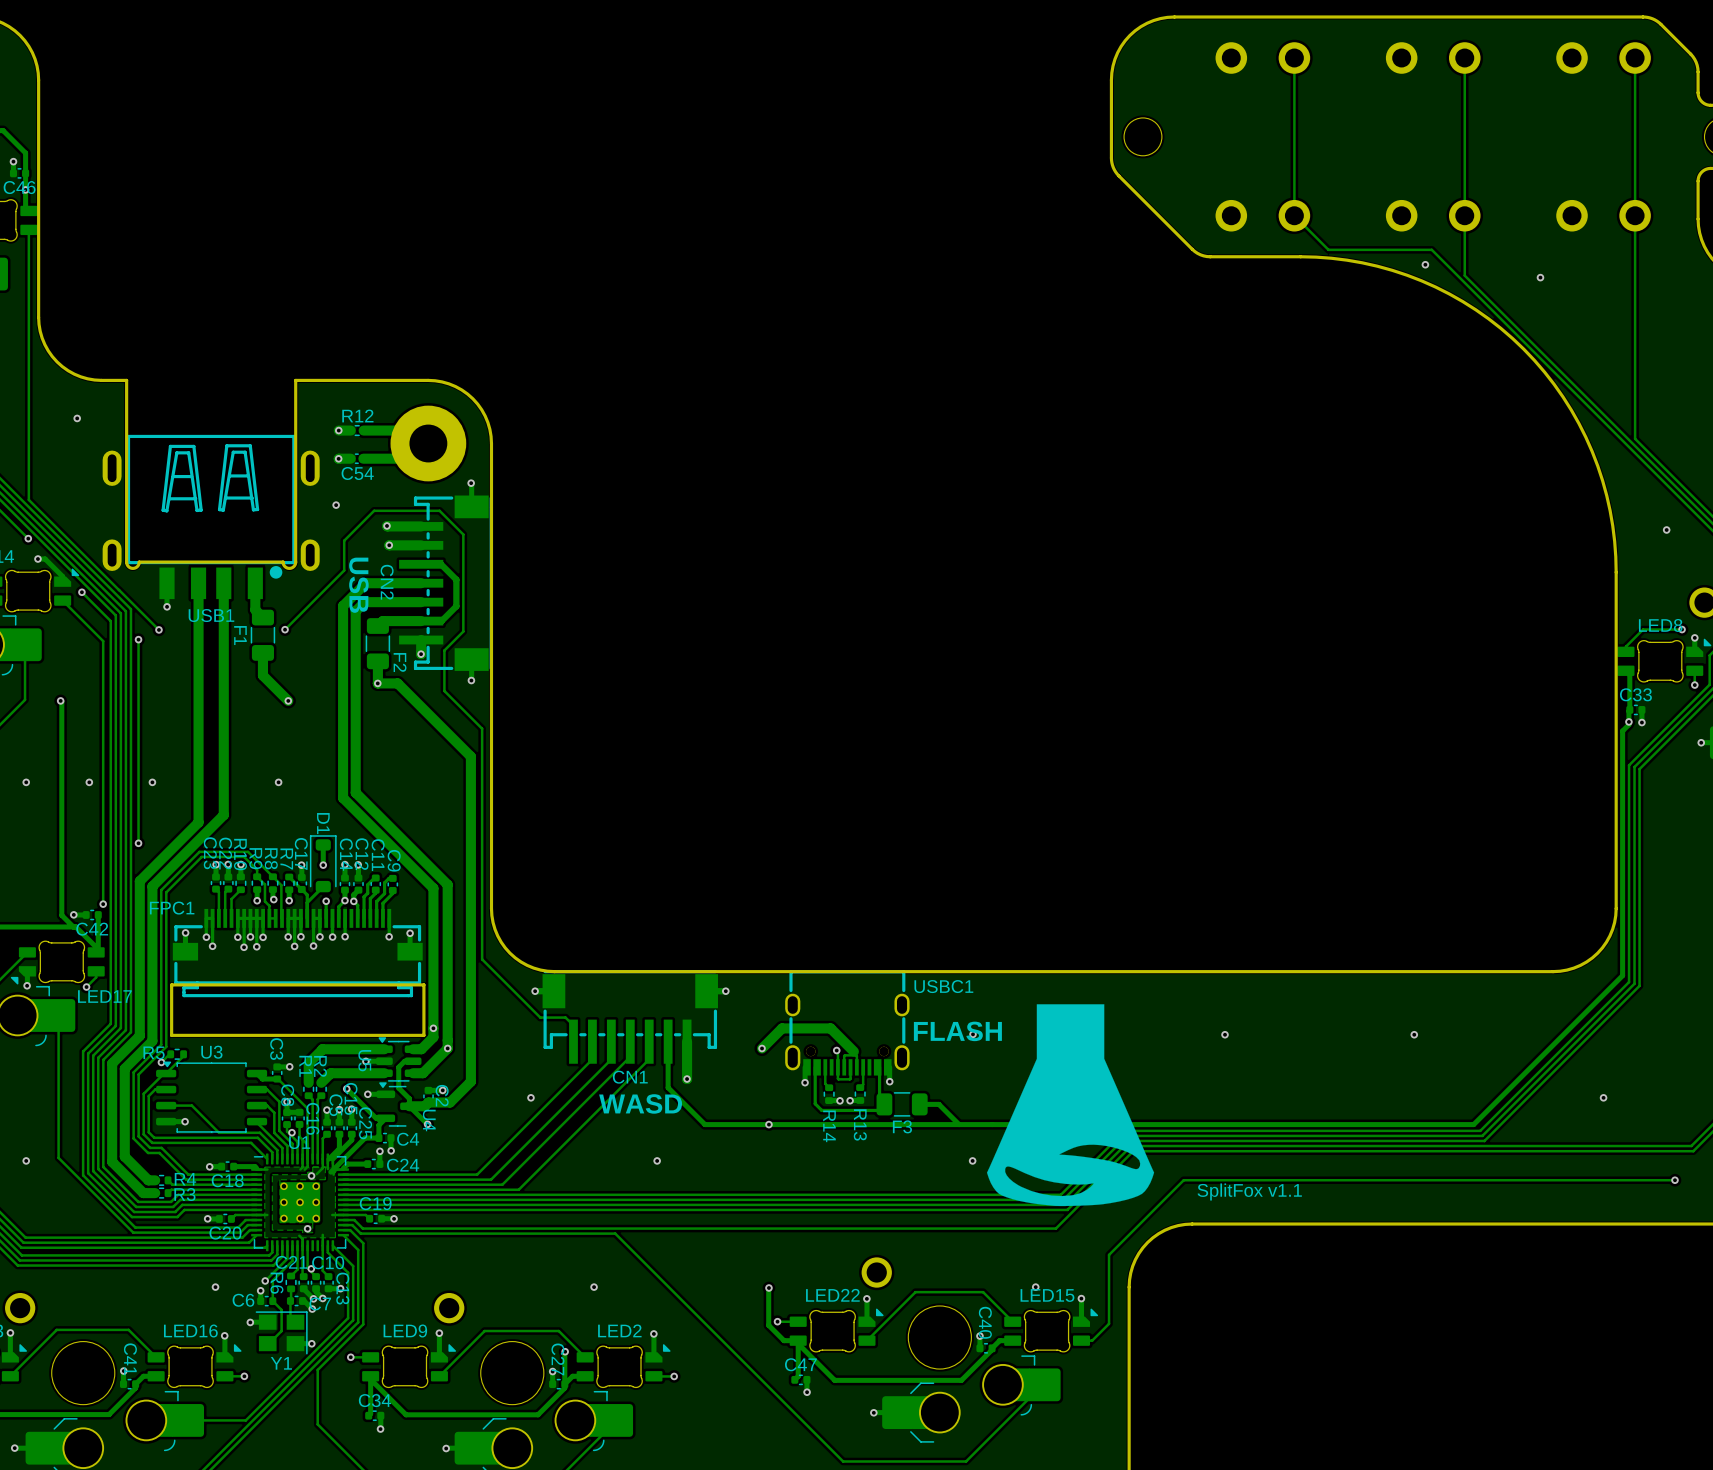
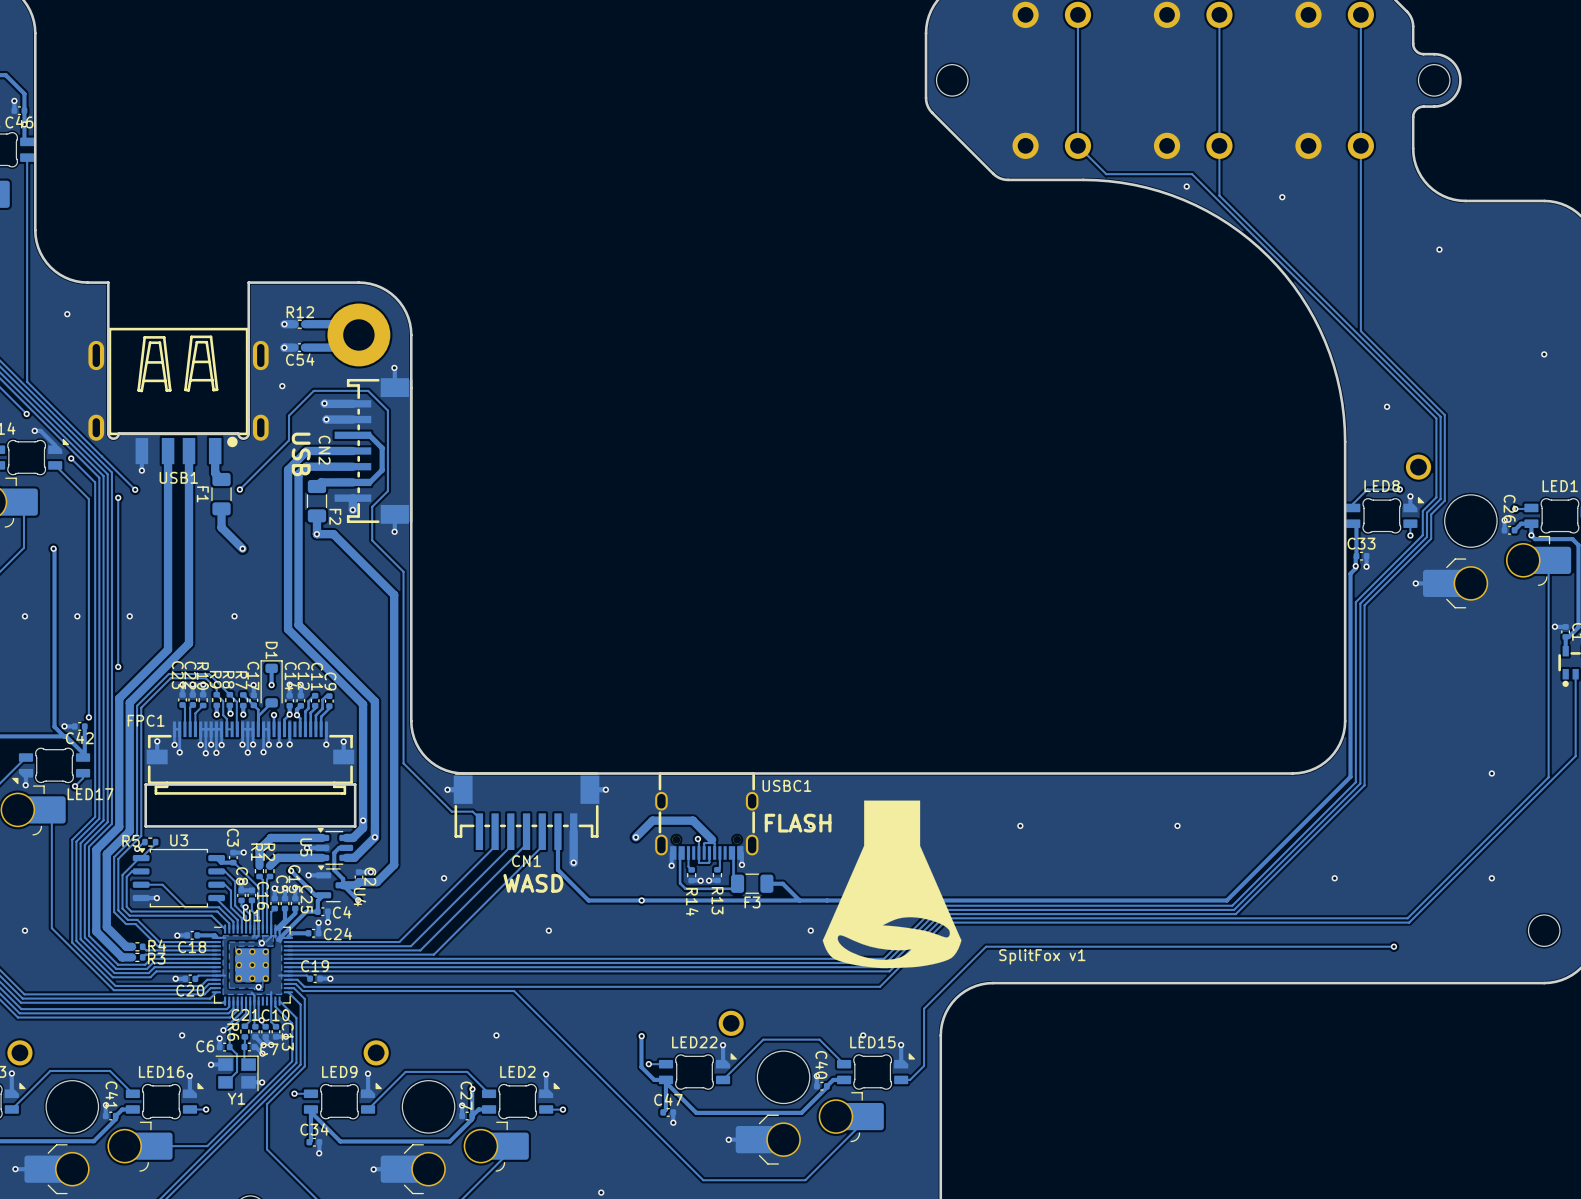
text: SplitFox v1.1 (1249, 1191) -> SplitFox v1 (1042, 956)

